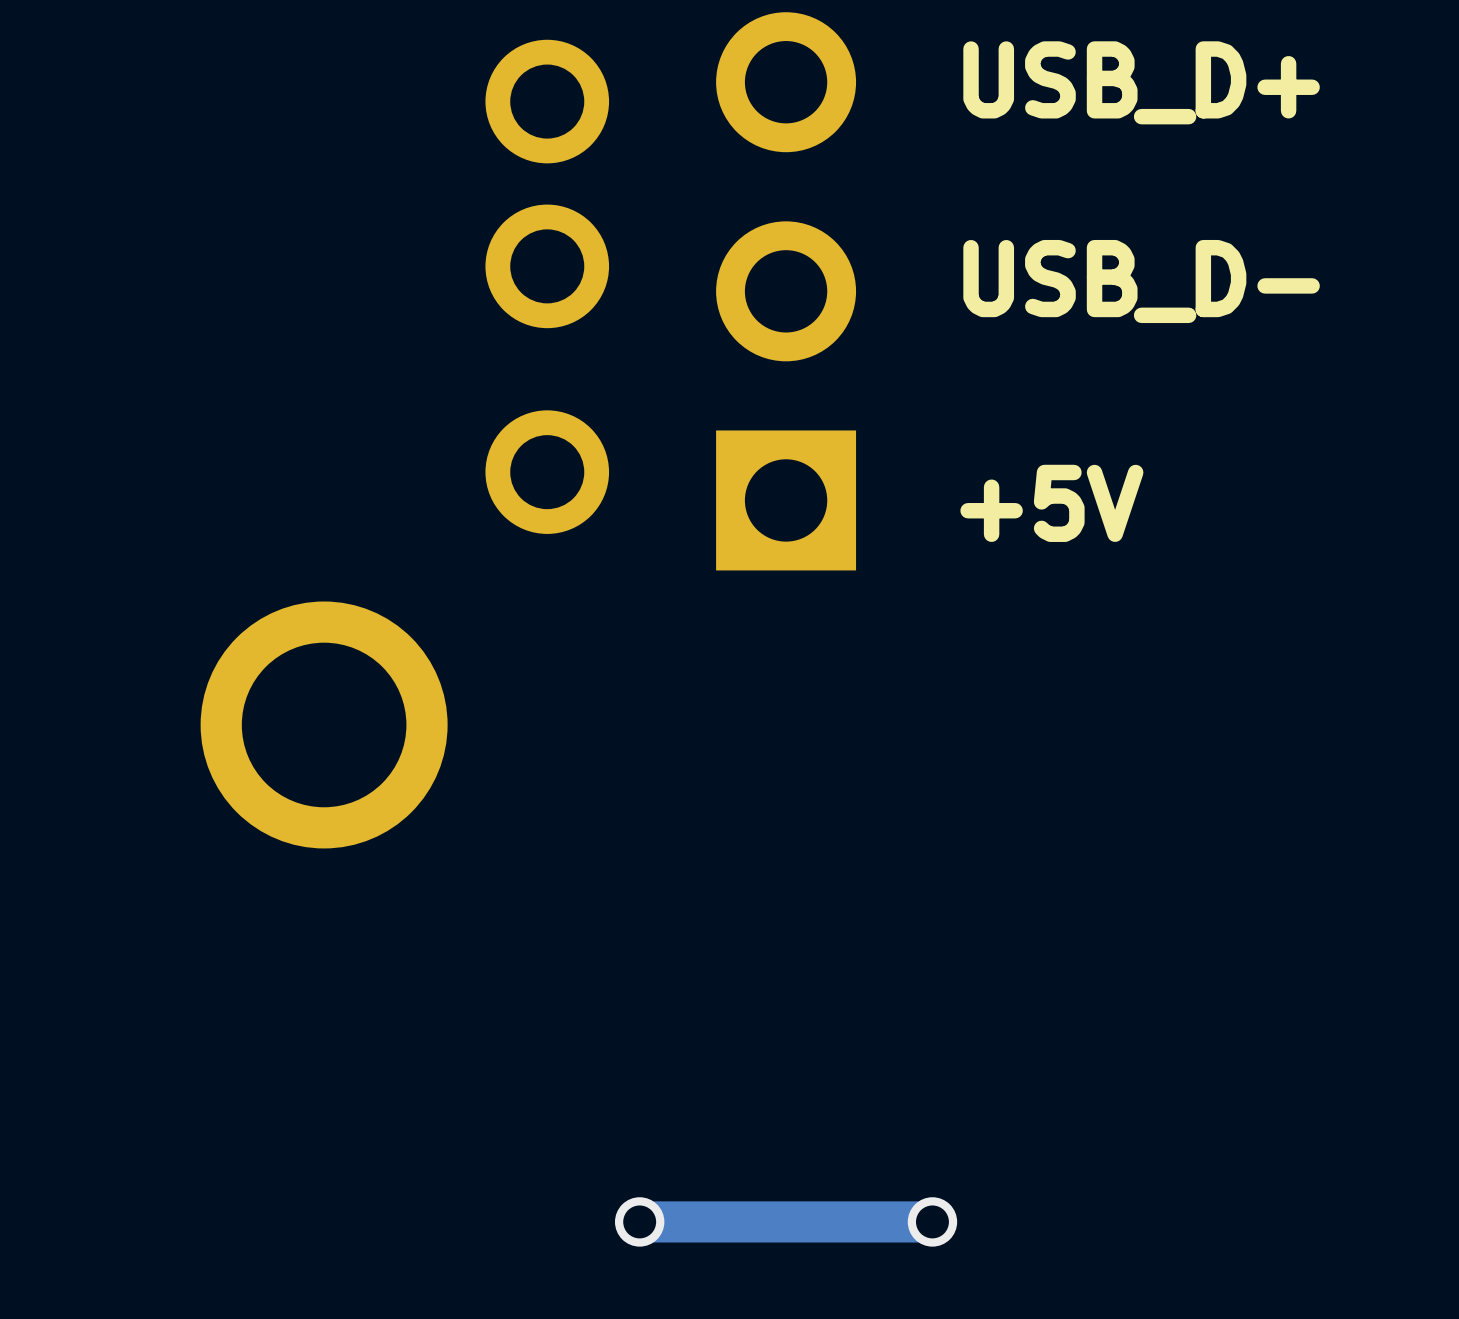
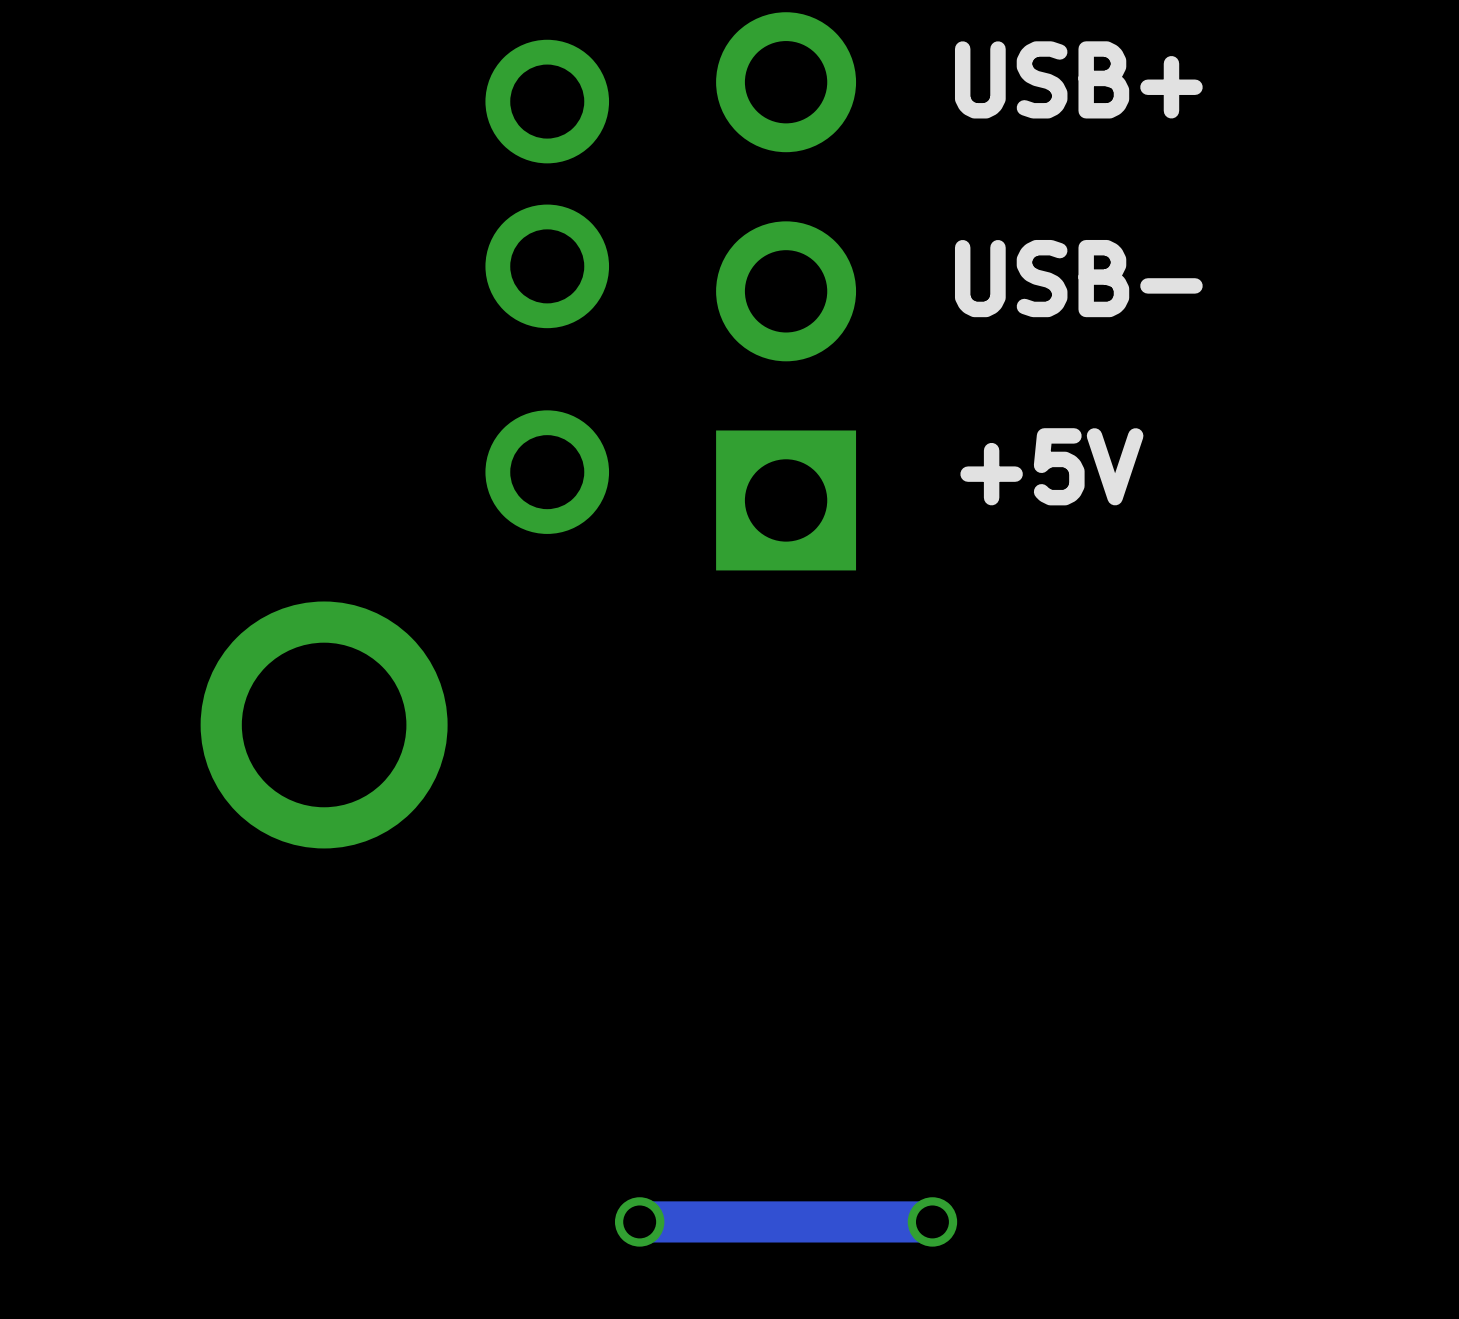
text: USB_D+ (1141, 82) -> USB+ (1078, 79)
text: USB_D- (1141, 281) -> USB- (1078, 278)
text position: +5V (1051, 503) -> +5V (1051, 466)

